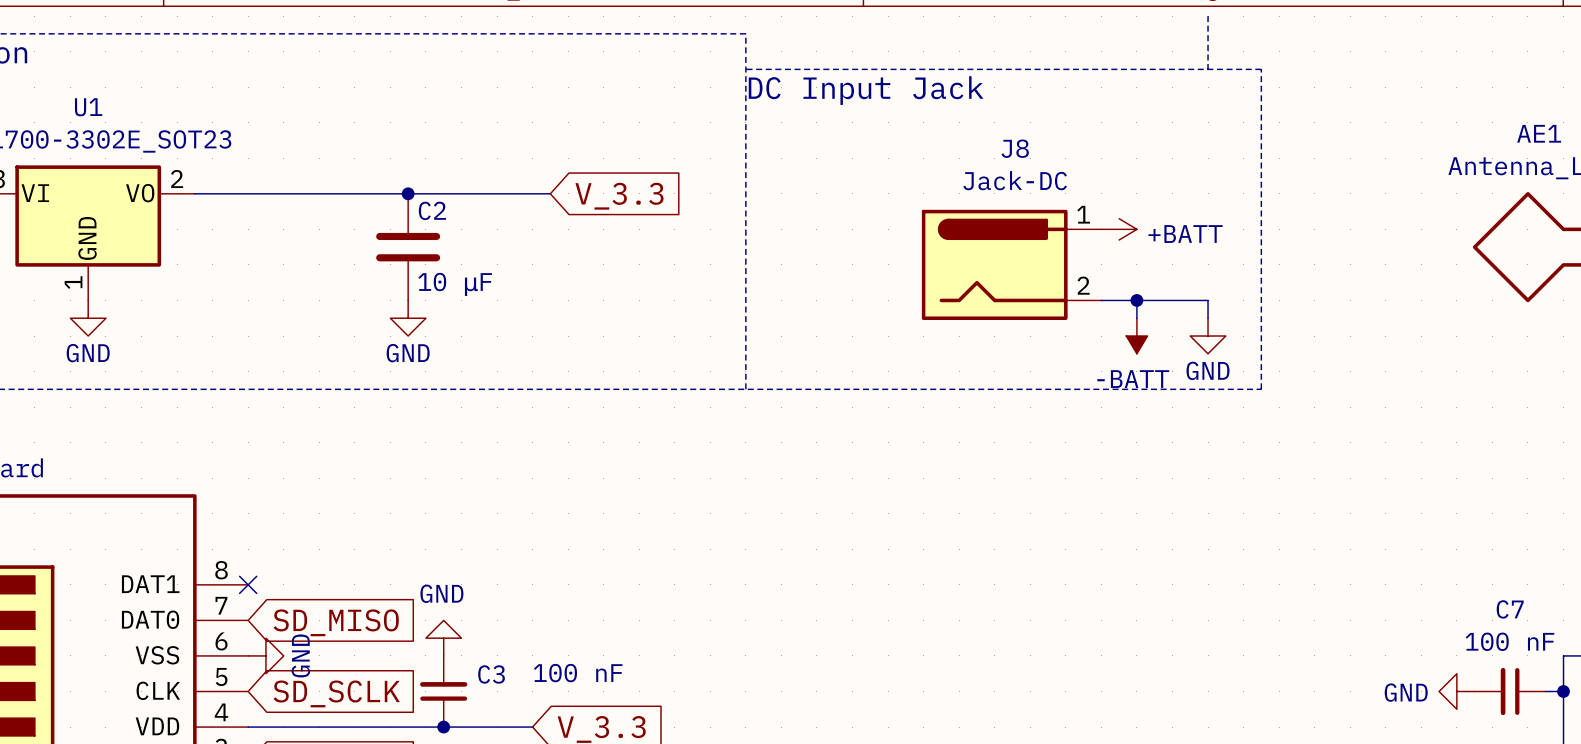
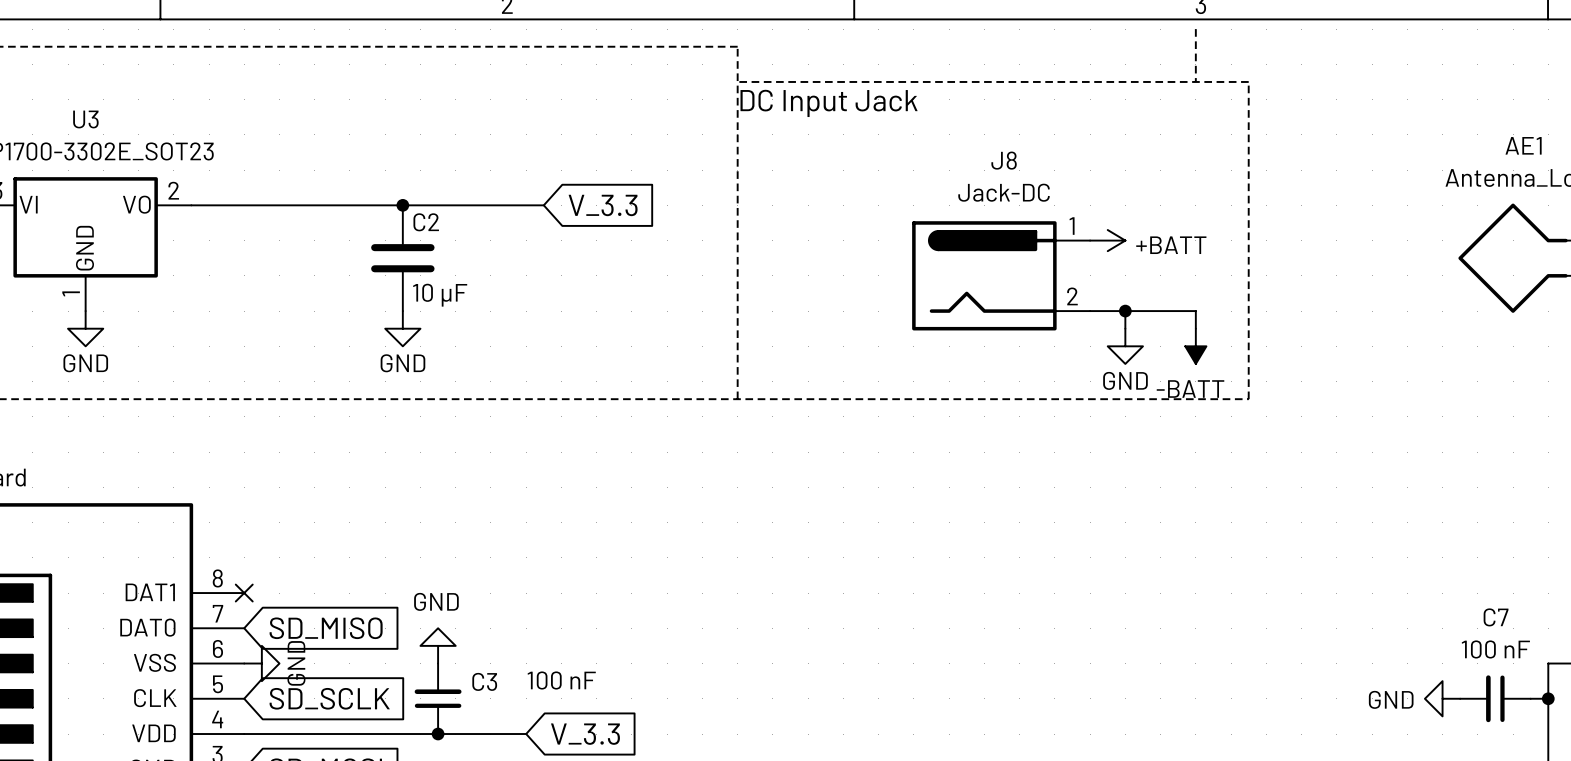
U1 name: U1 (88, 107) -> U3 (85, 119)
power symbol: -BATT (1136, 336) -> GND (1125, 346)
power symbol: GND (1208, 336) -> -BATT (1195, 346)

